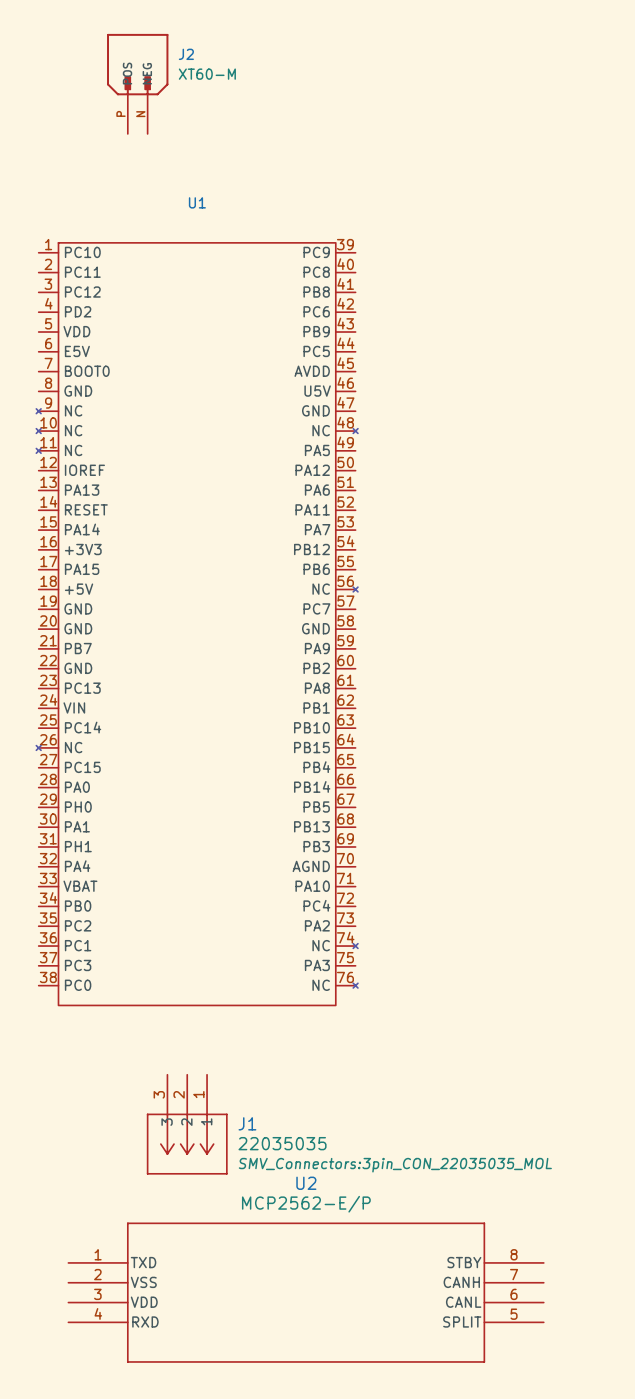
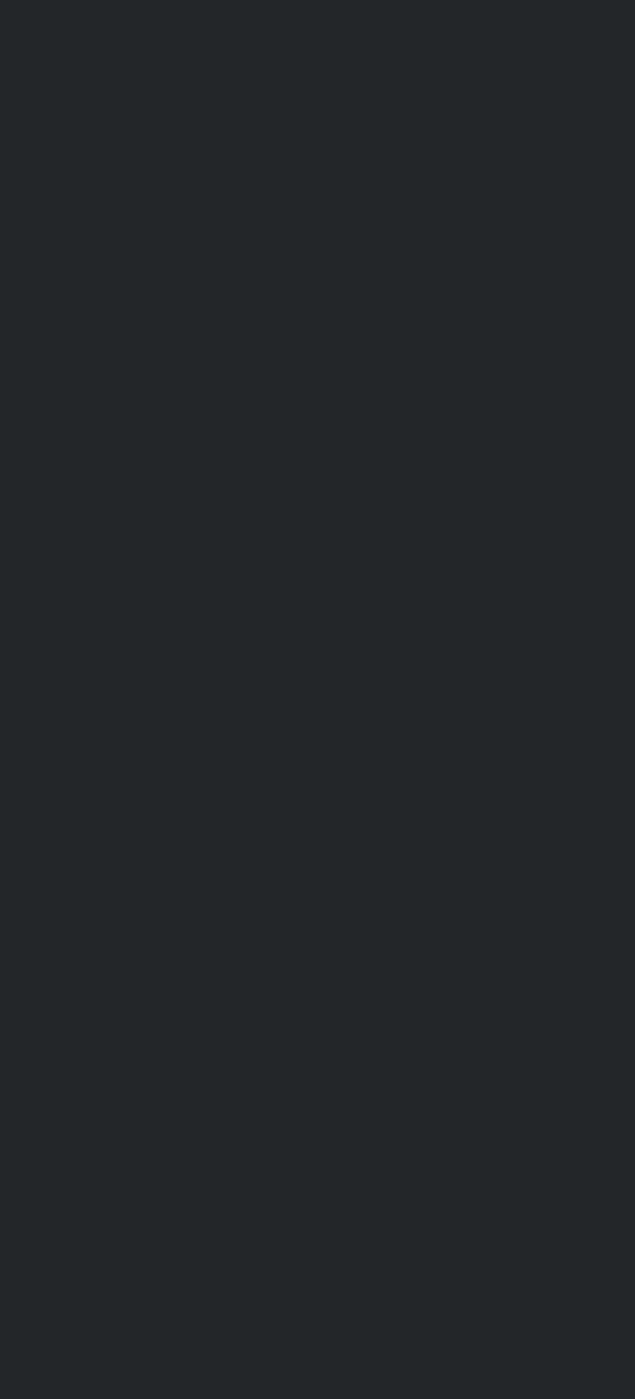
J2: XT60-M (137, 83) -> none
U1: (197, 624) -> none
J1: 22035035 (187, 1124) -> none
U2: MCP2562-E/P (306, 1292) -> none

